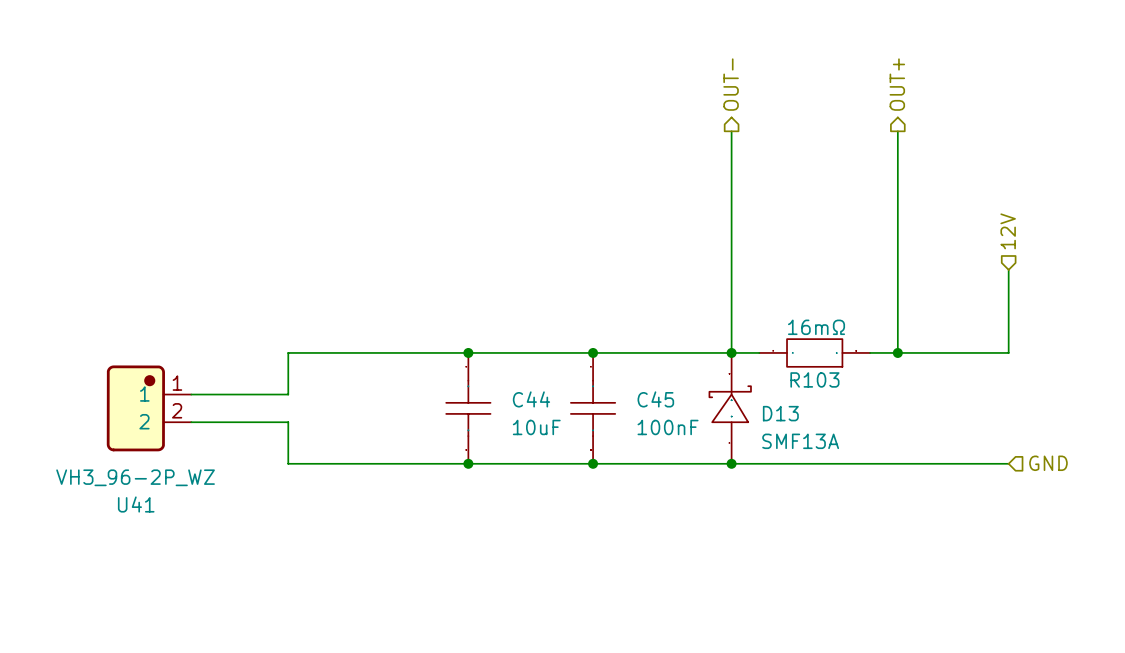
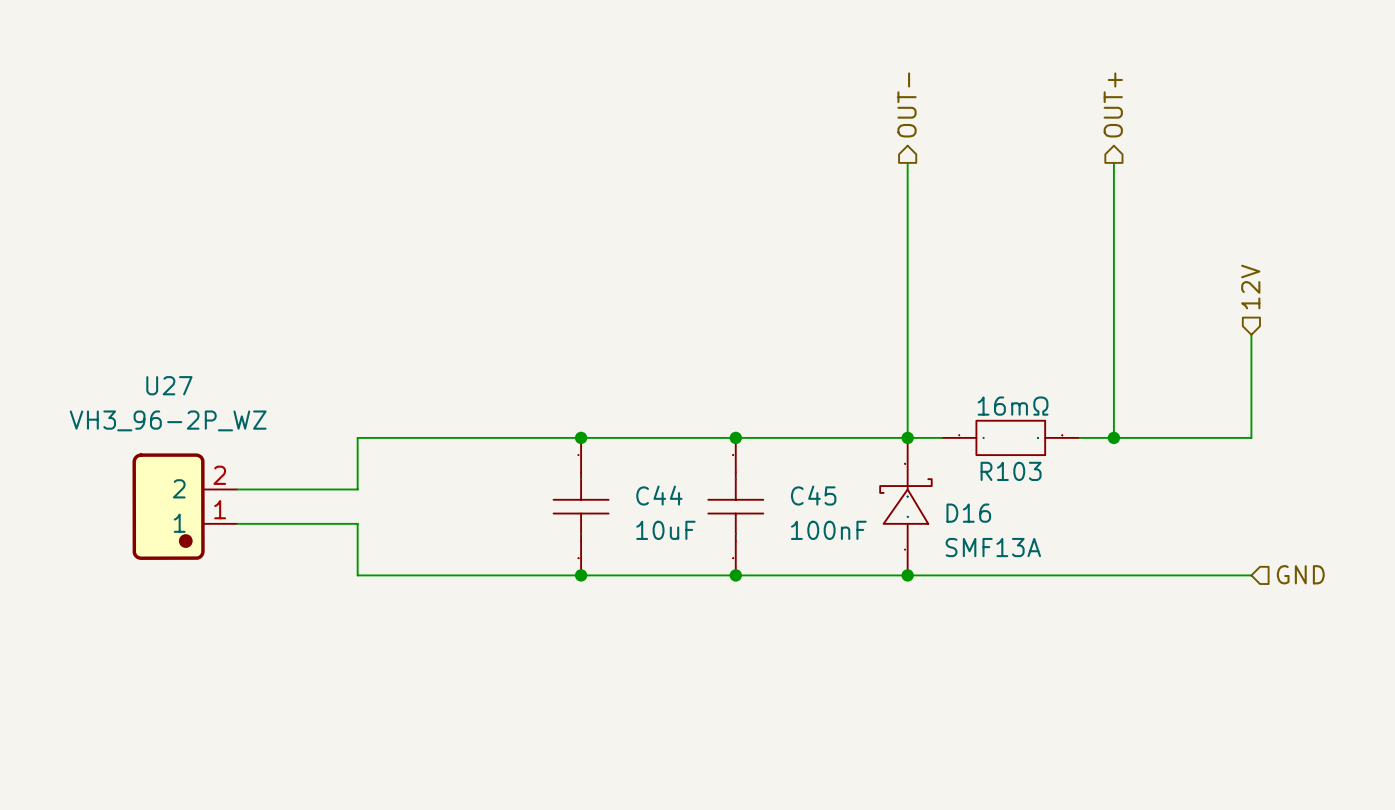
U41: VH3_96-2P_WZ (149, 408) -> none
U27: none -> VH3_96-2P_WZ (184, 506)
D13 name: D13 (780, 413) -> D16 (968, 513)

